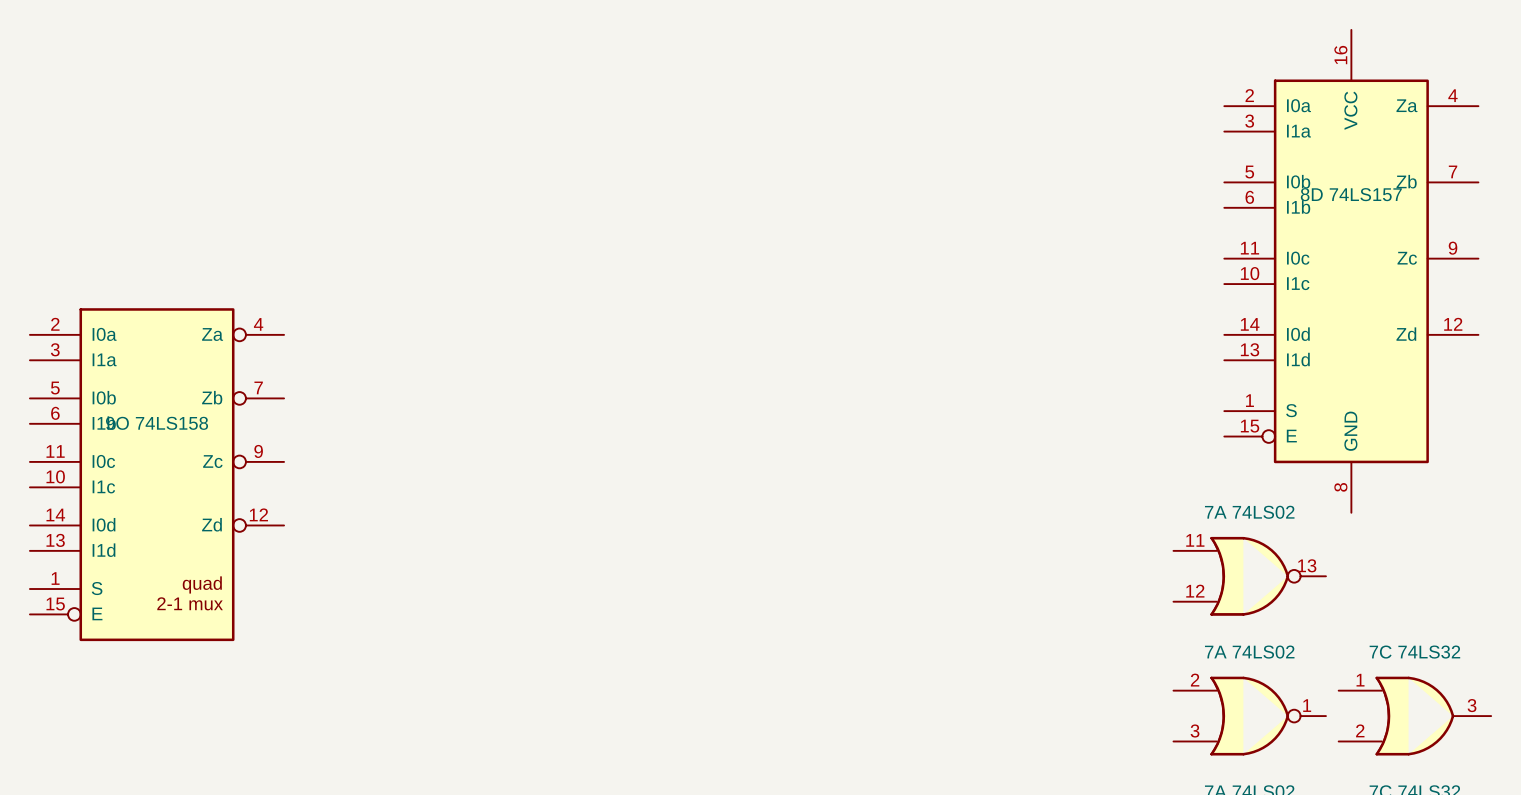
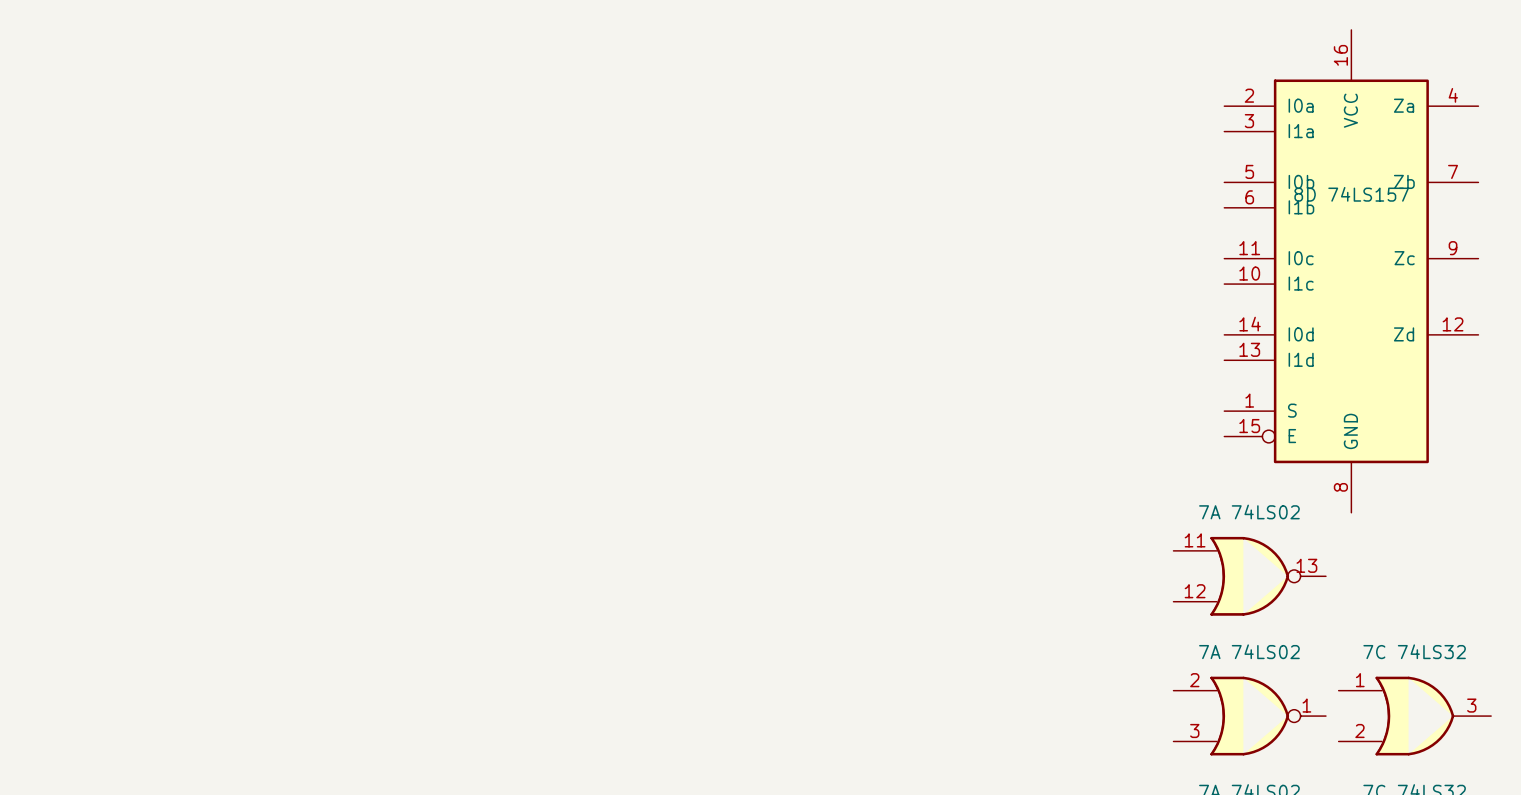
part: 9O 74LS158 (156, 474) -> none

